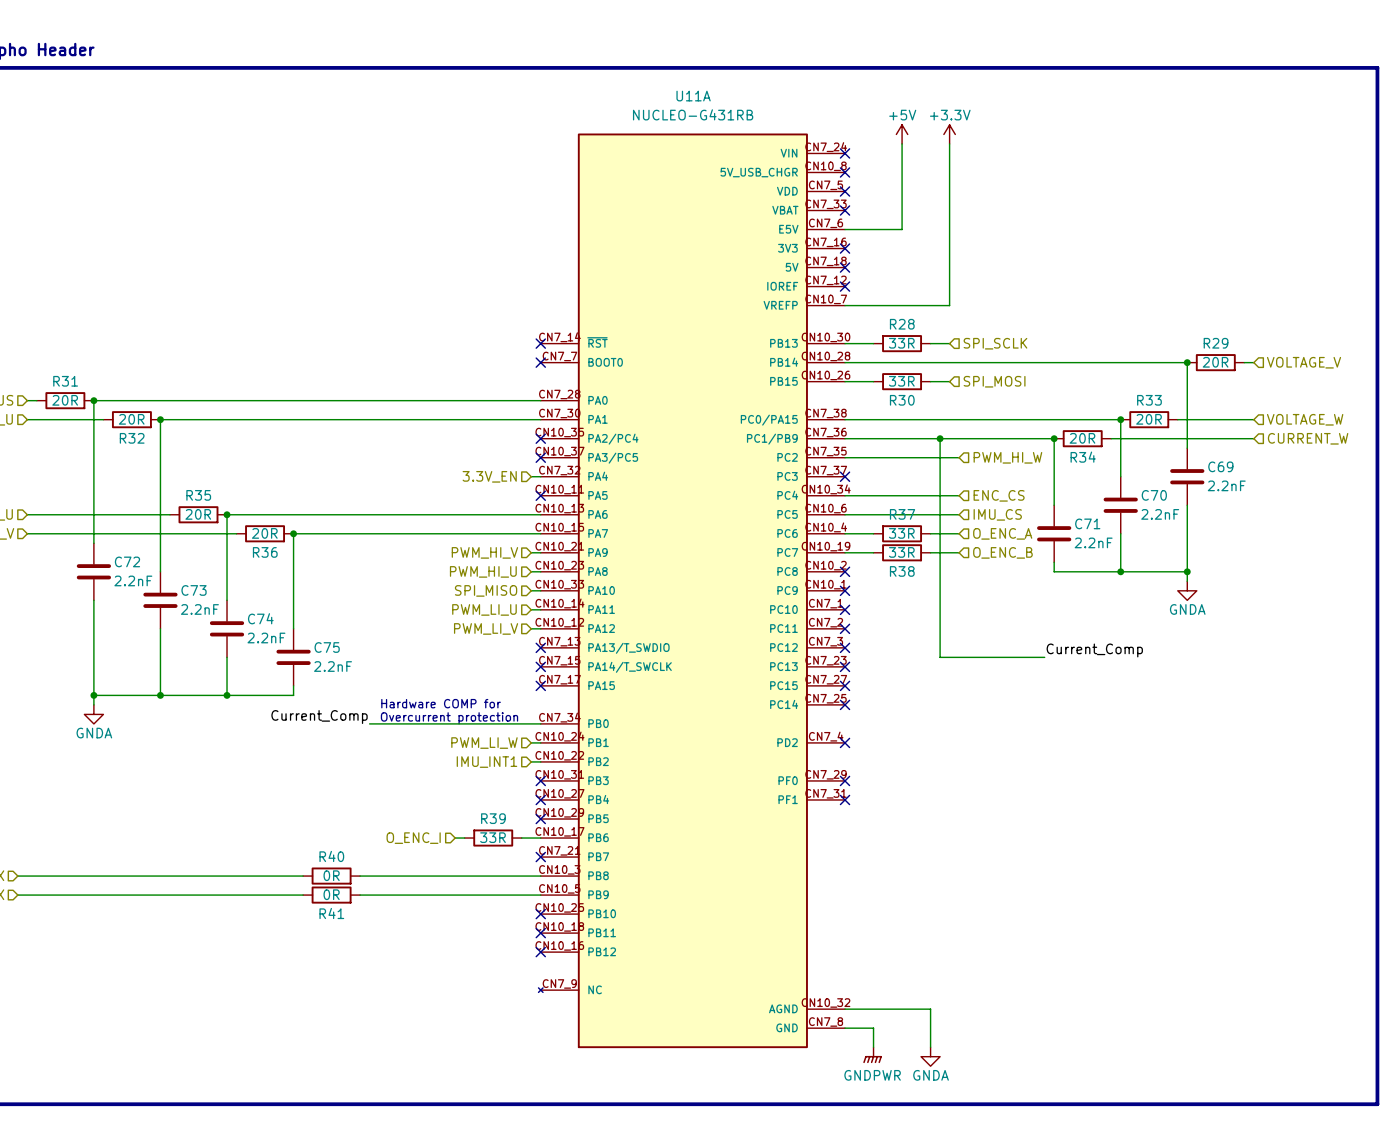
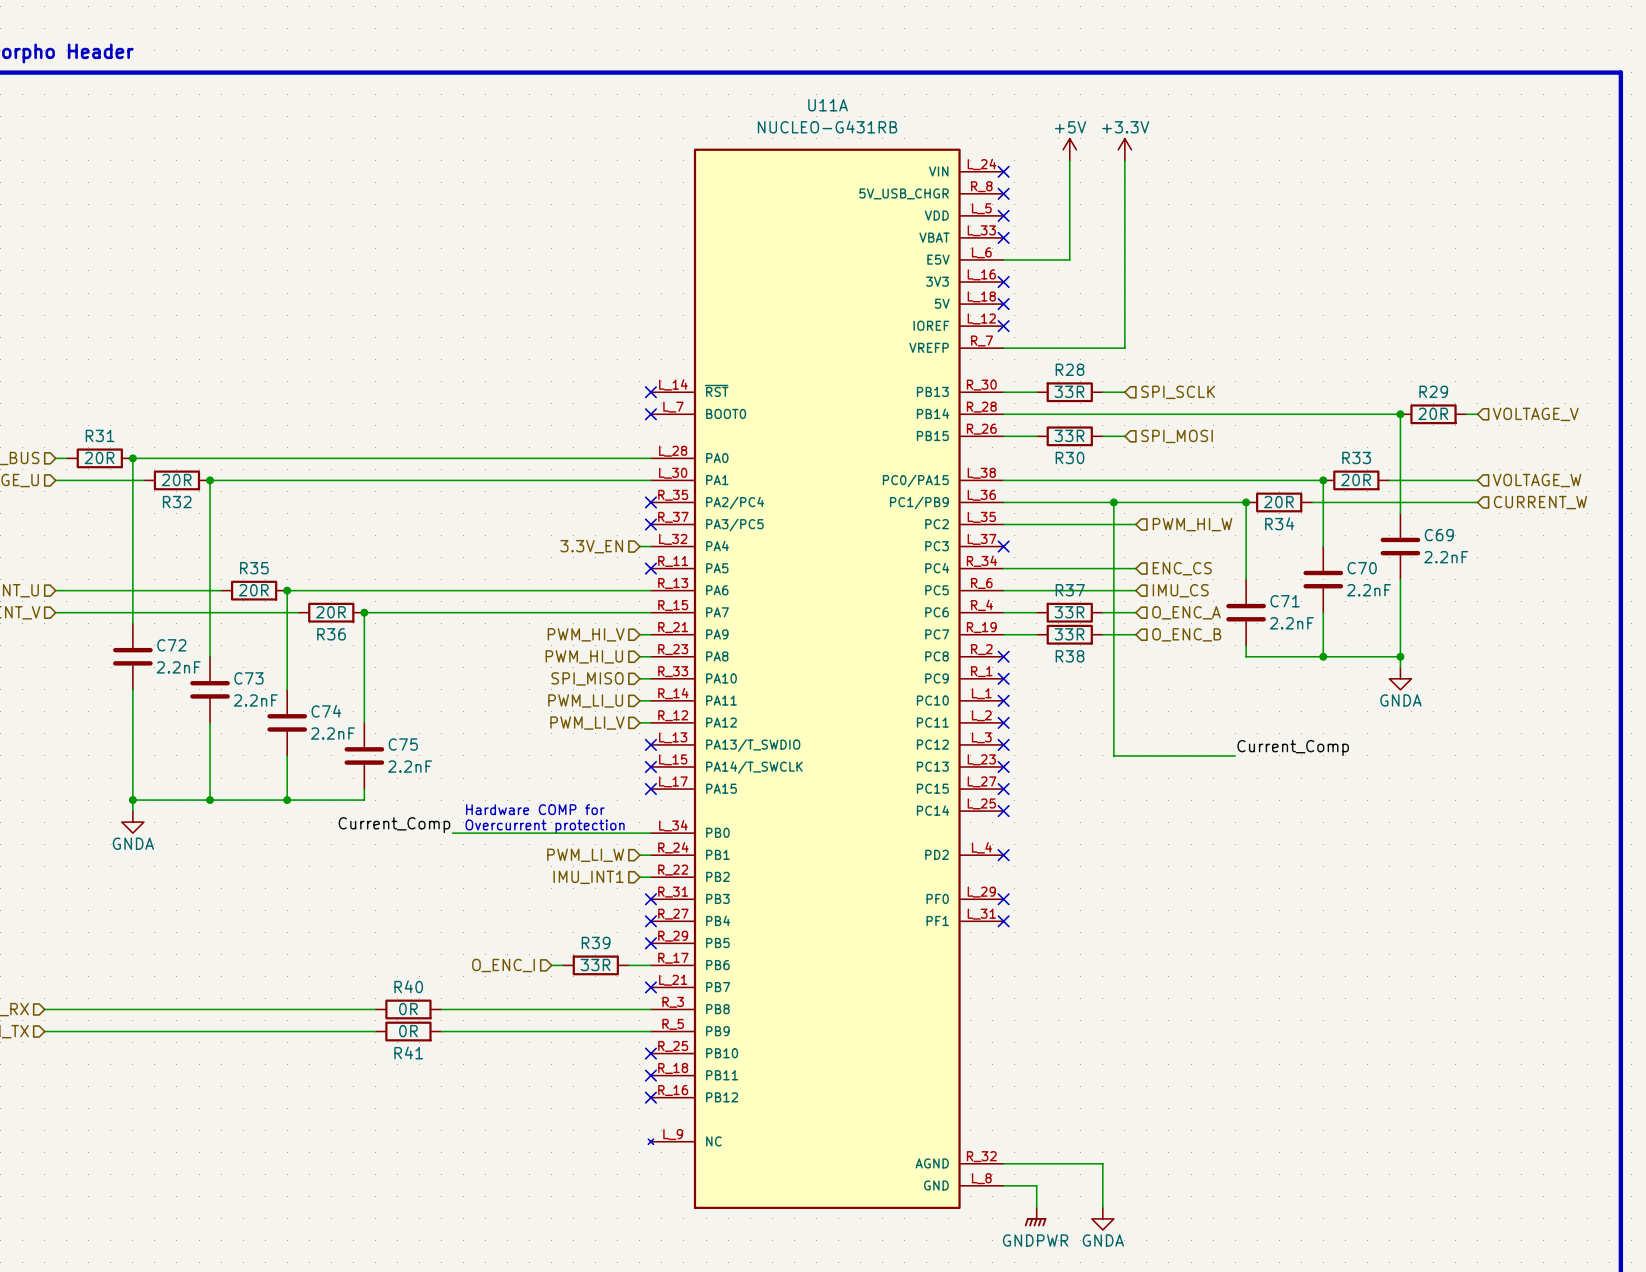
U11A symbol: [538, 133, 846, 1049] -> [648, 148, 1004, 1209]

